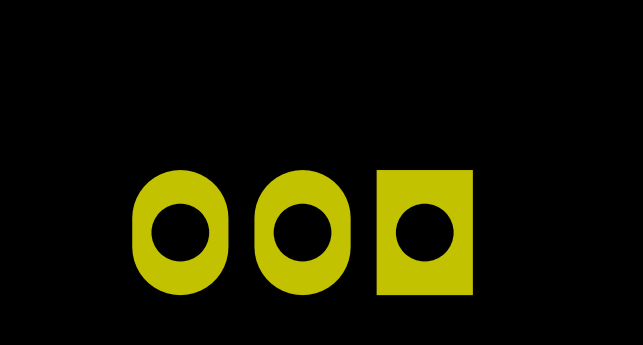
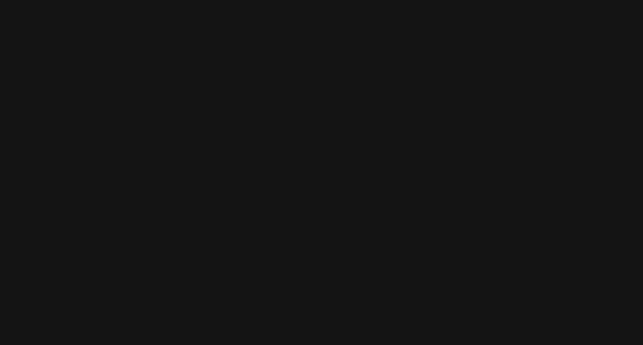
part: (302, 232) -> none

